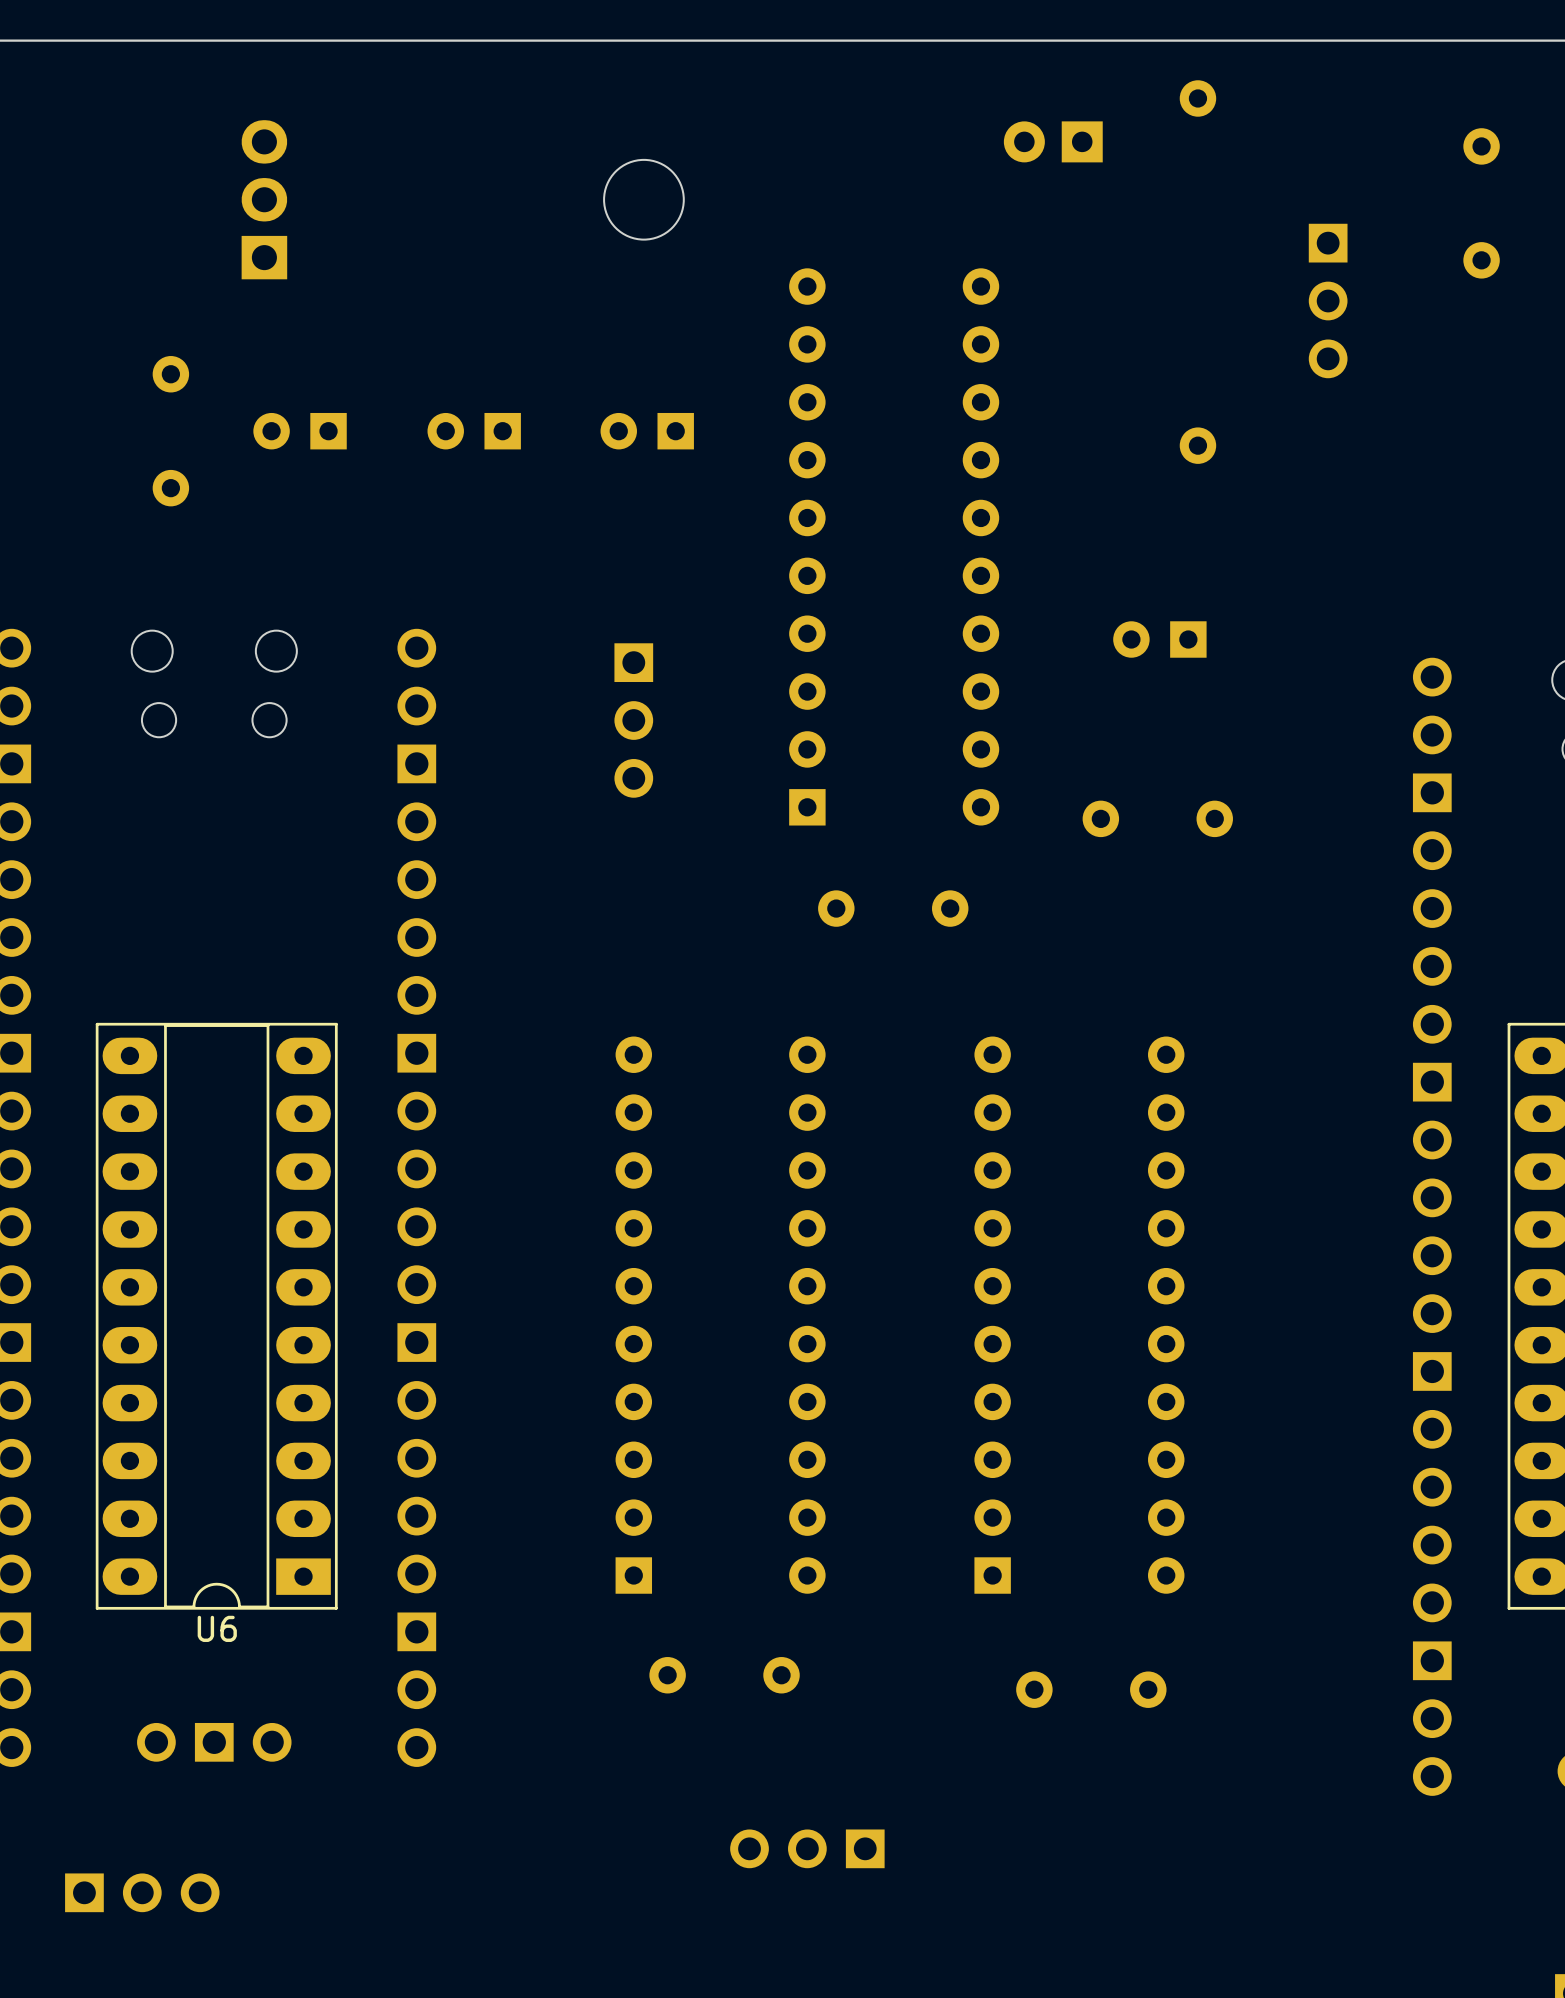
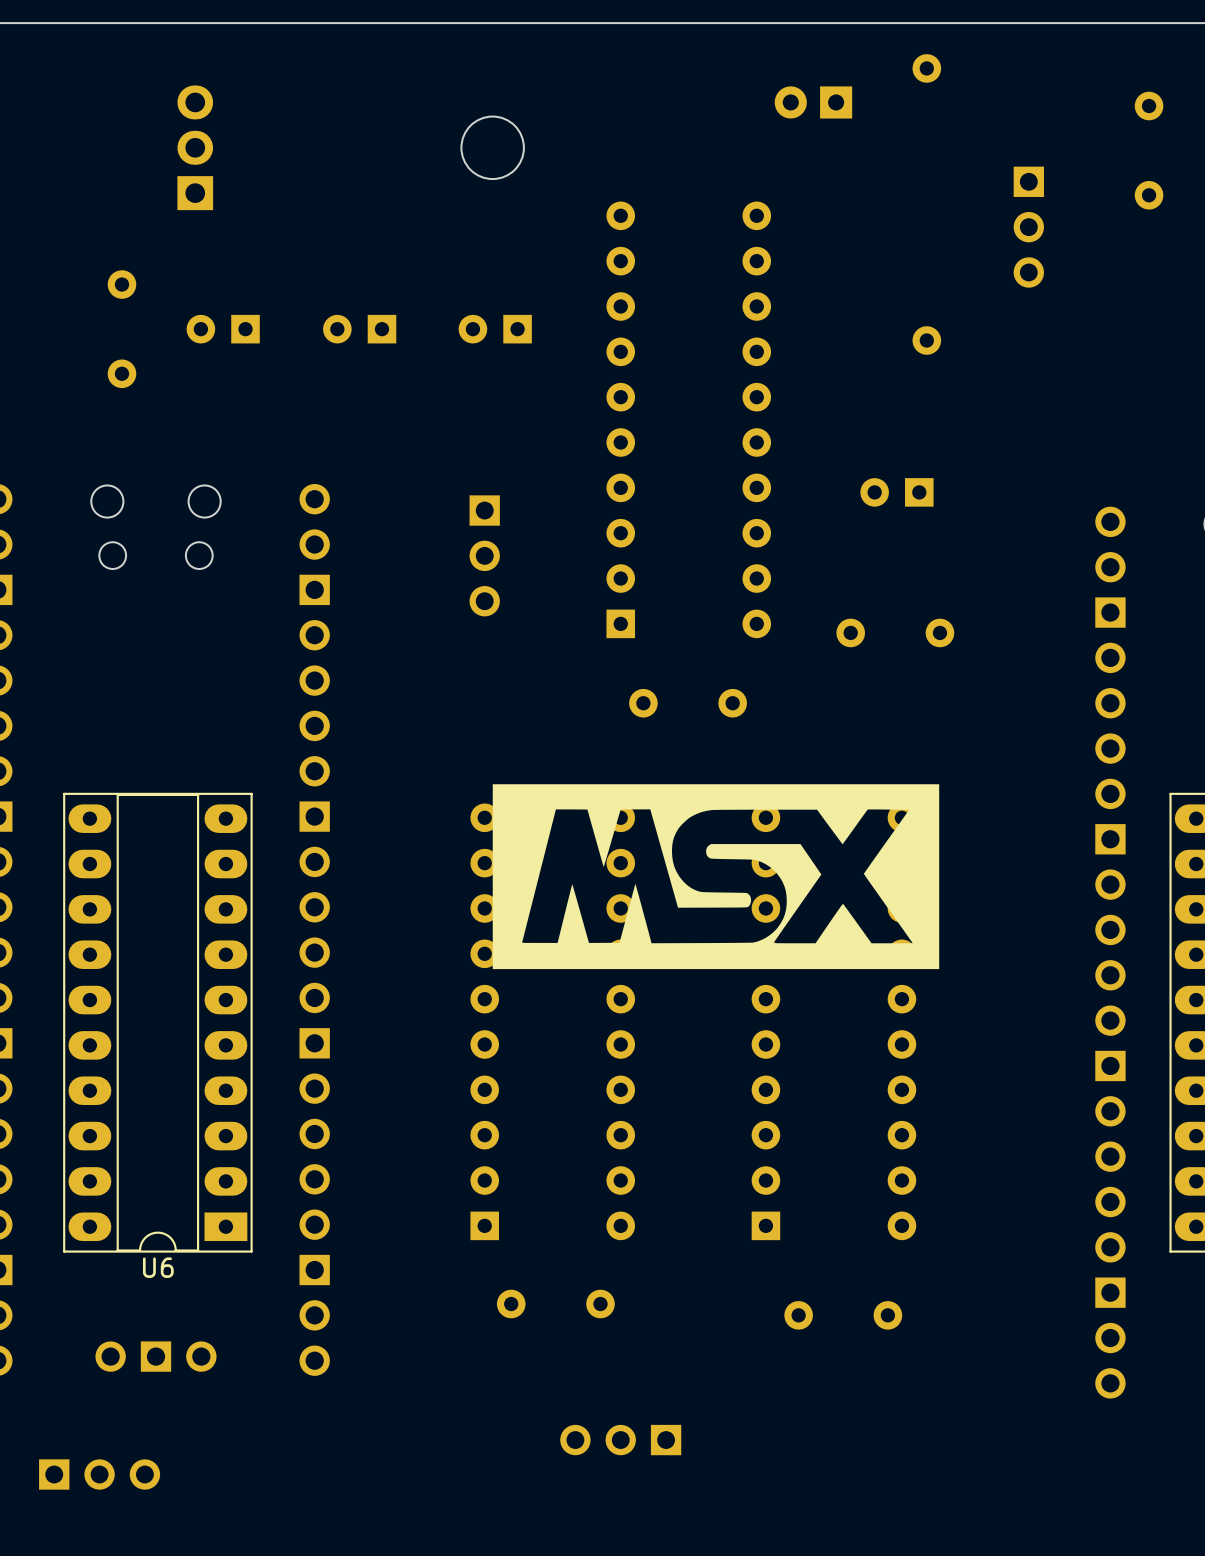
drawing: none -> [492, 784, 940, 970]

